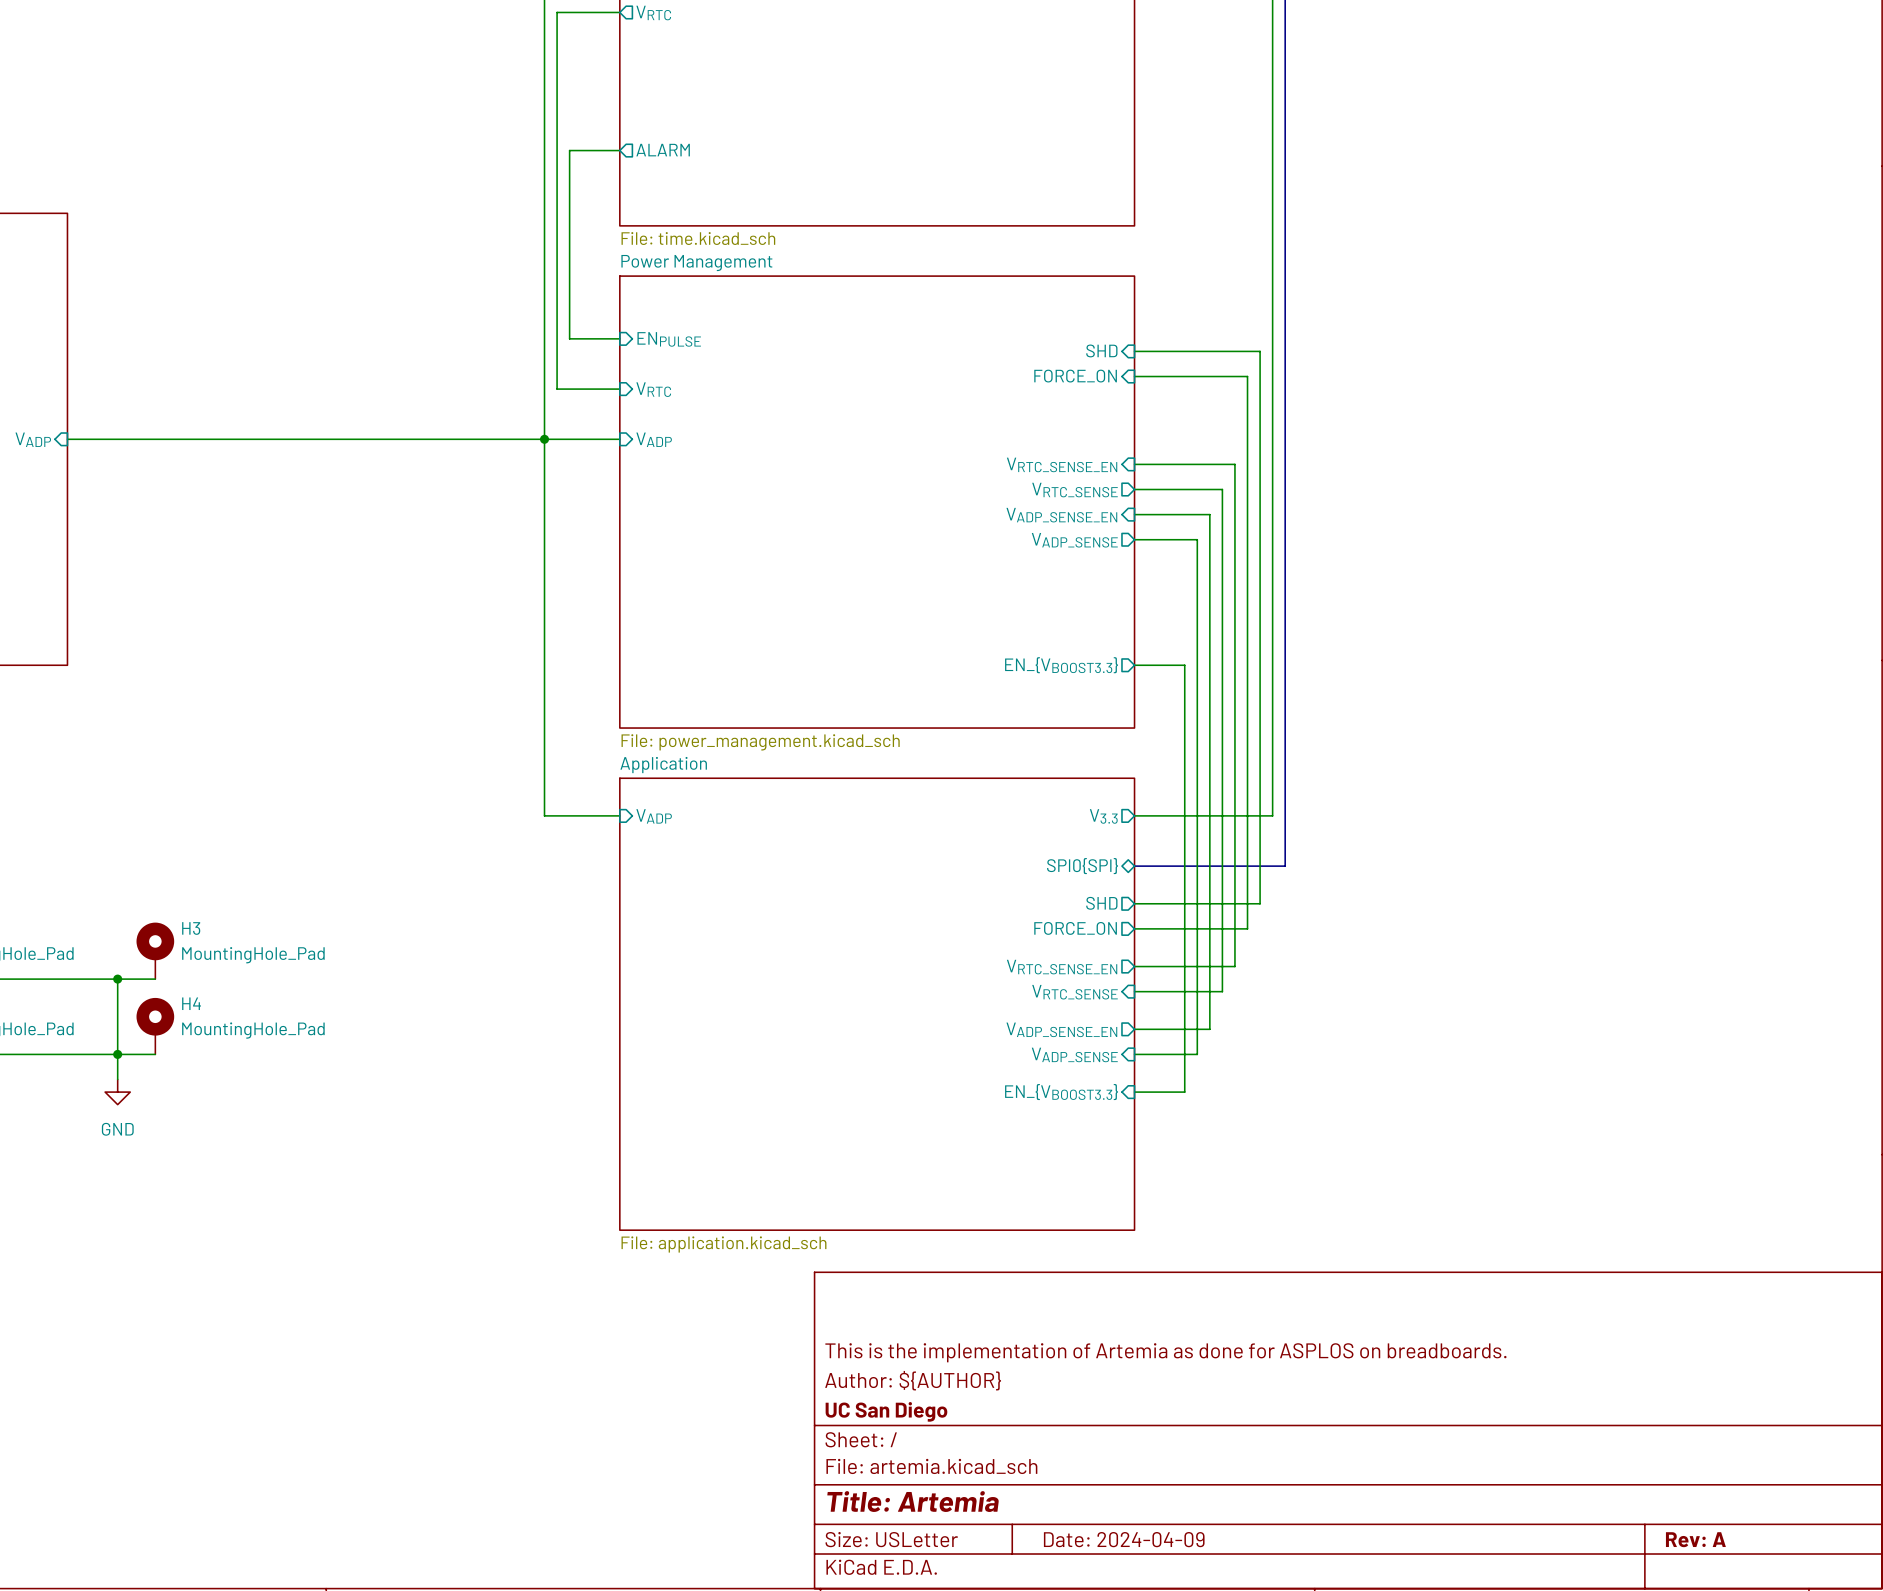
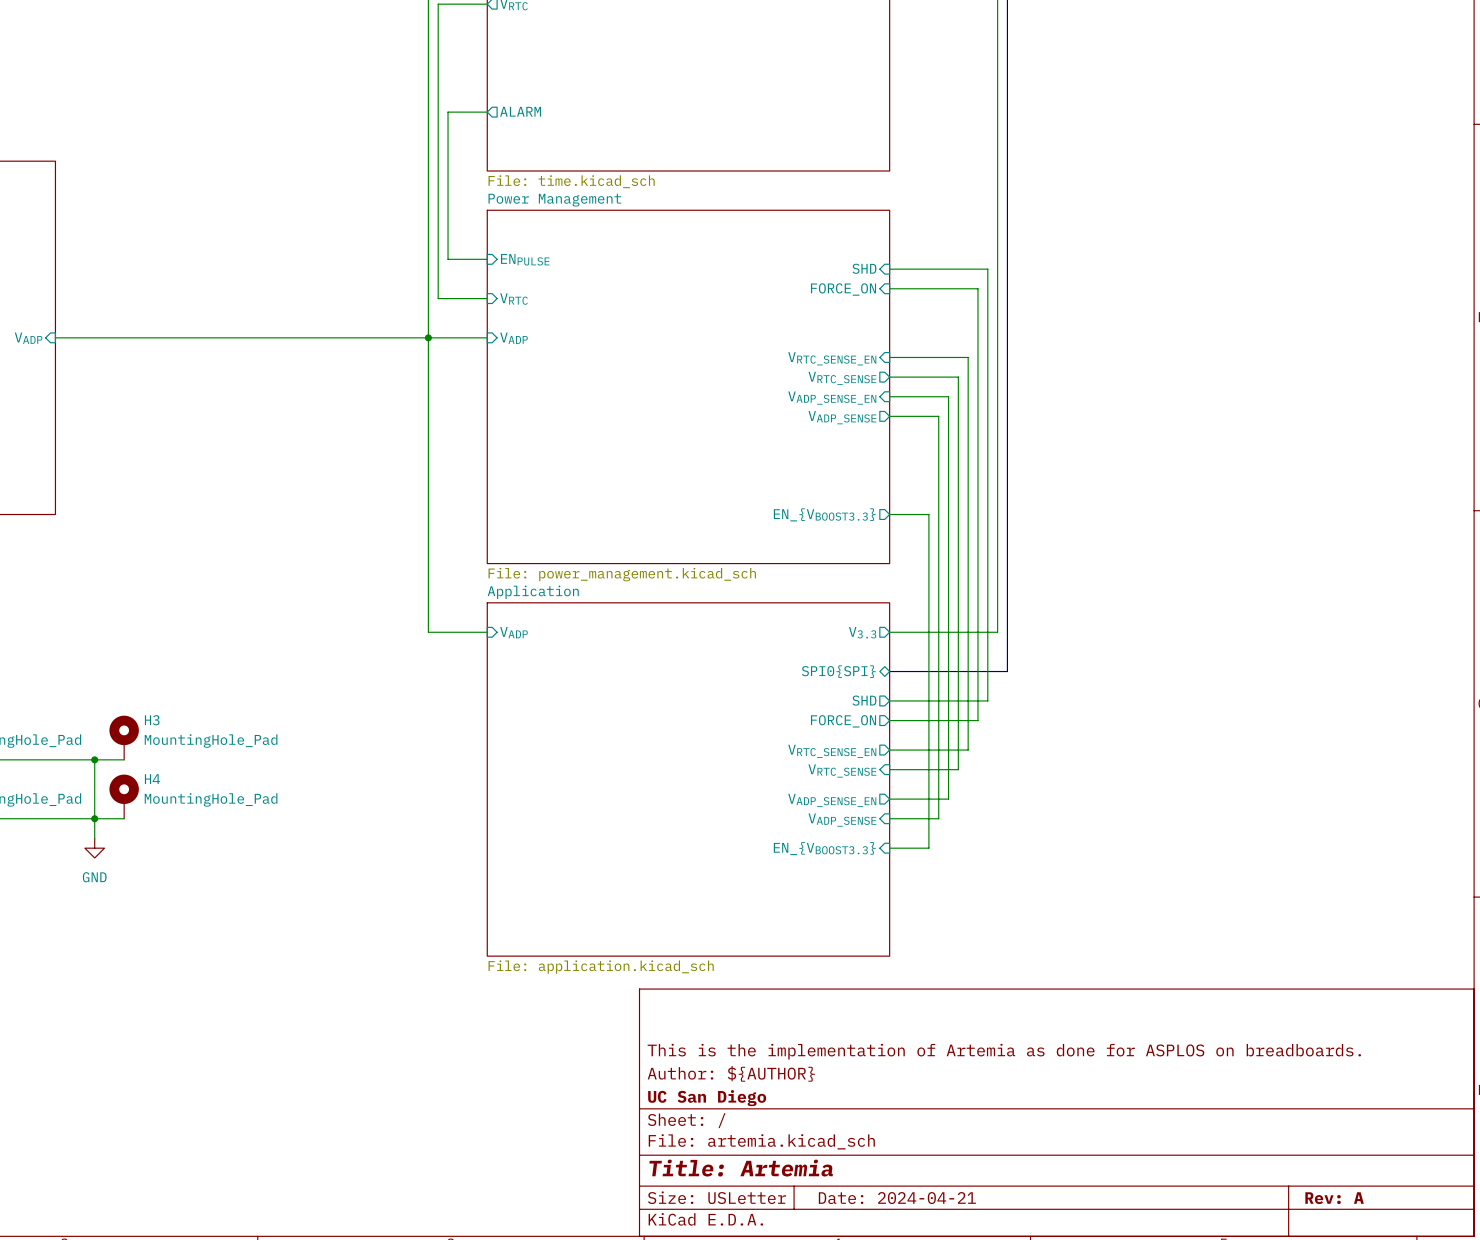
title block: Date: 2024-04-09 (1124, 1539) -> Date: 2024-04-21 (897, 1198)

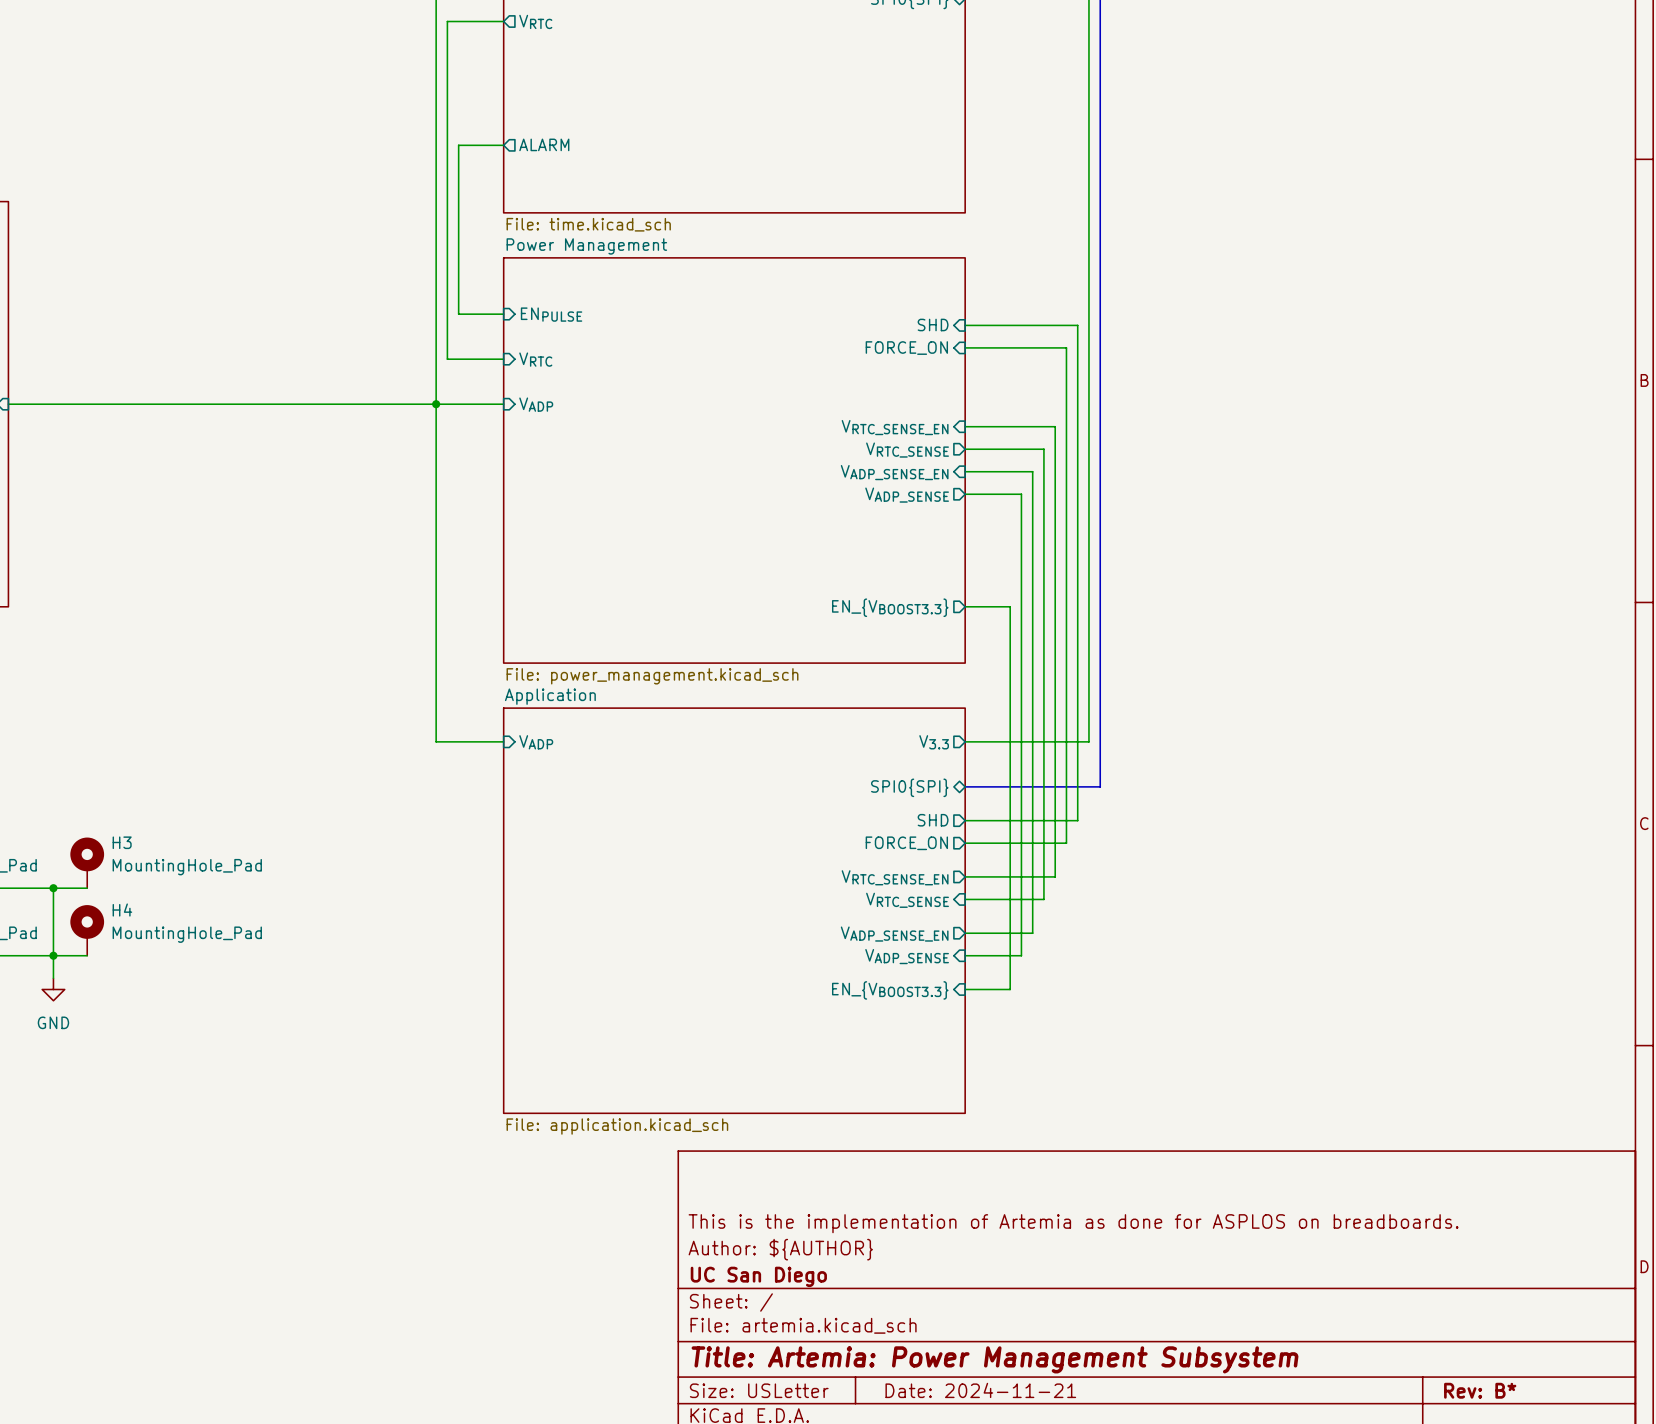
title block: Title: Artemia (741, 1168) -> Title: Artemia: Power Management Subsystem (995, 1359)
title block: Date: 2024-04-21 (897, 1198) -> Date: 2024-11-21 (980, 1390)
title block: Rev: A (1334, 1198) -> Rev: B* (1480, 1390)

